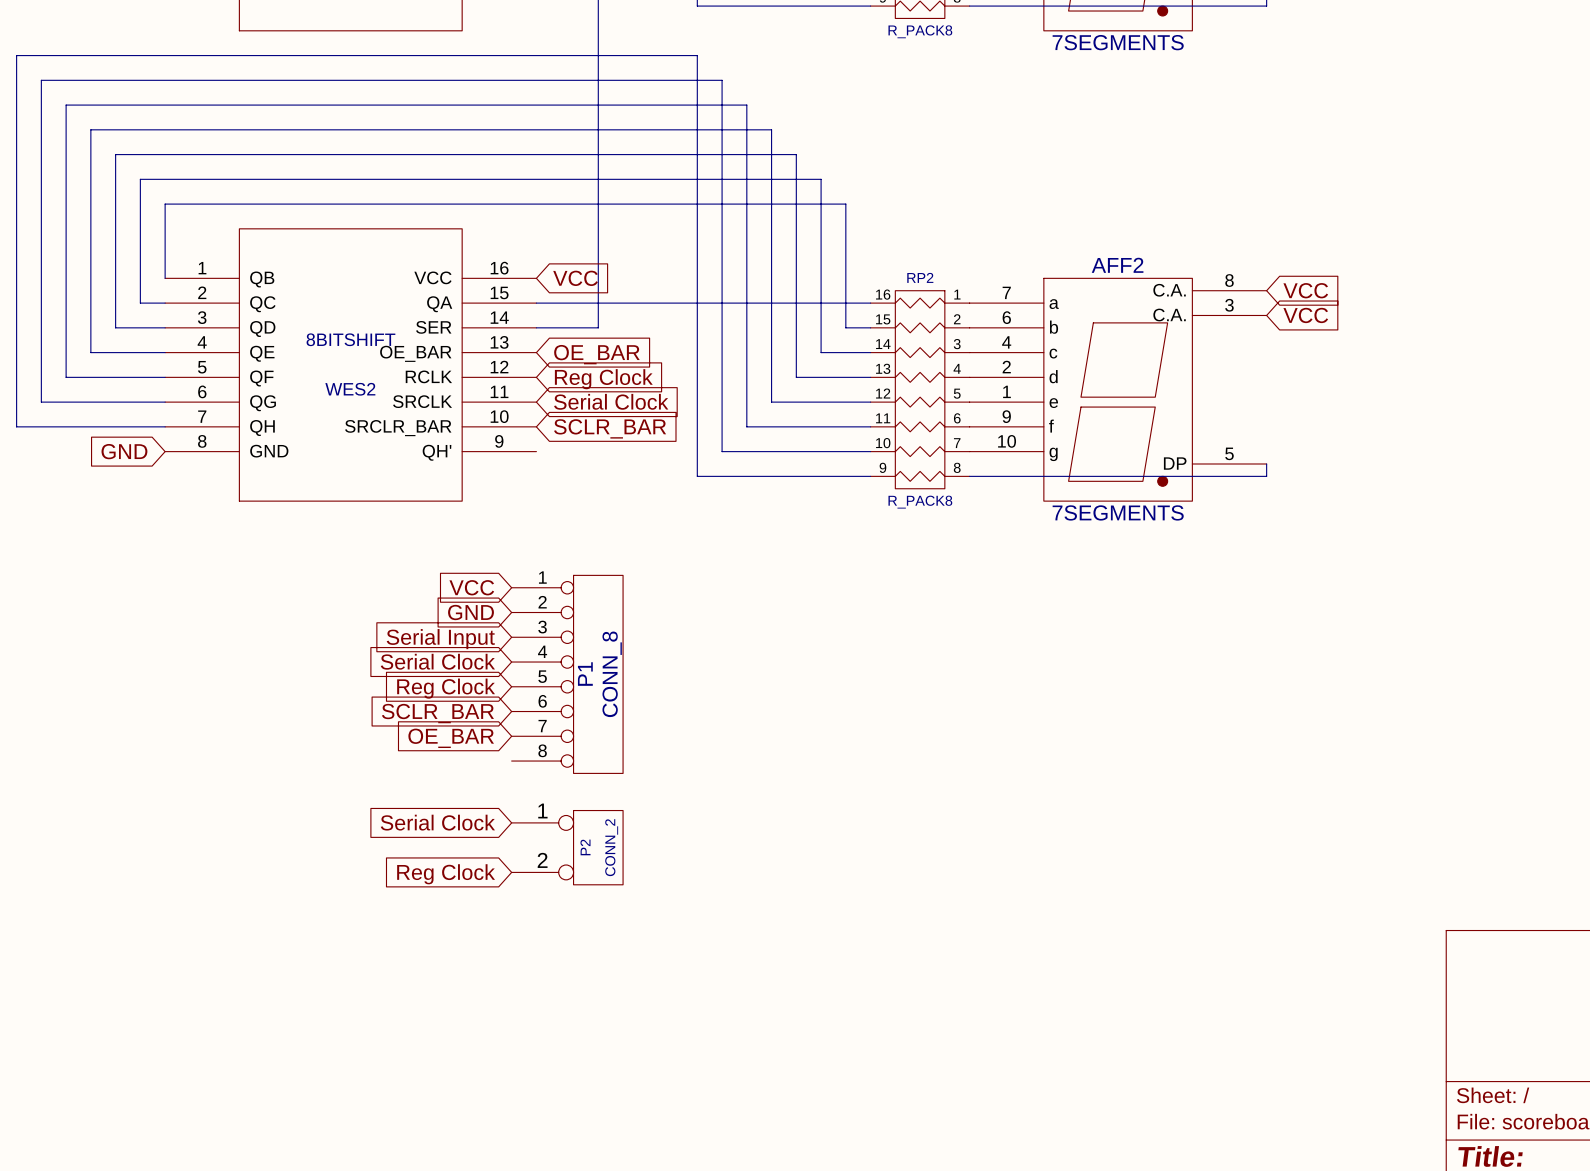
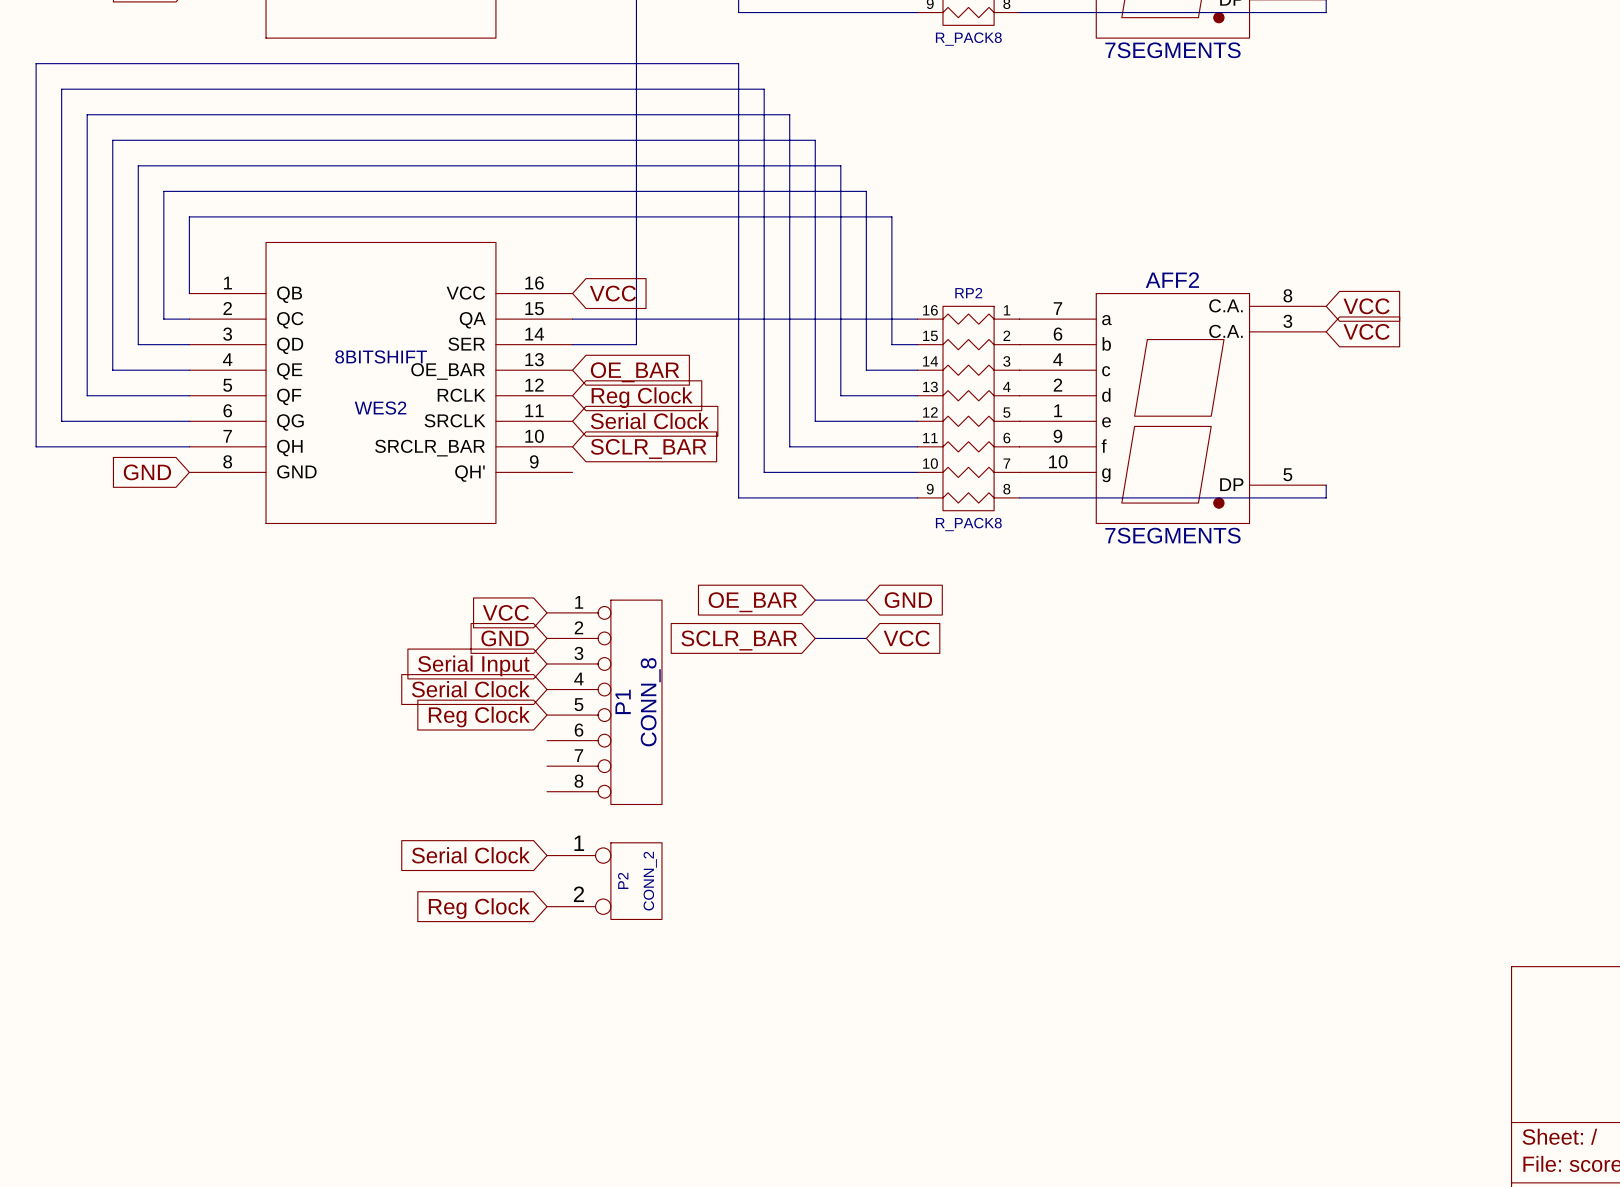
wire: none -> (815, 600) (866, 600)
global label: none -> GND (908, 600)
global label: none -> OE_BAR (752, 602)
wire: none -> (815, 638) (866, 638)
global label: none -> VCC (906, 638)
global label: none -> SCLR_BAR (739, 640)
global label: SCLR_BAR (437, 713) -> none
global label: OE_BAR (451, 738) -> none

